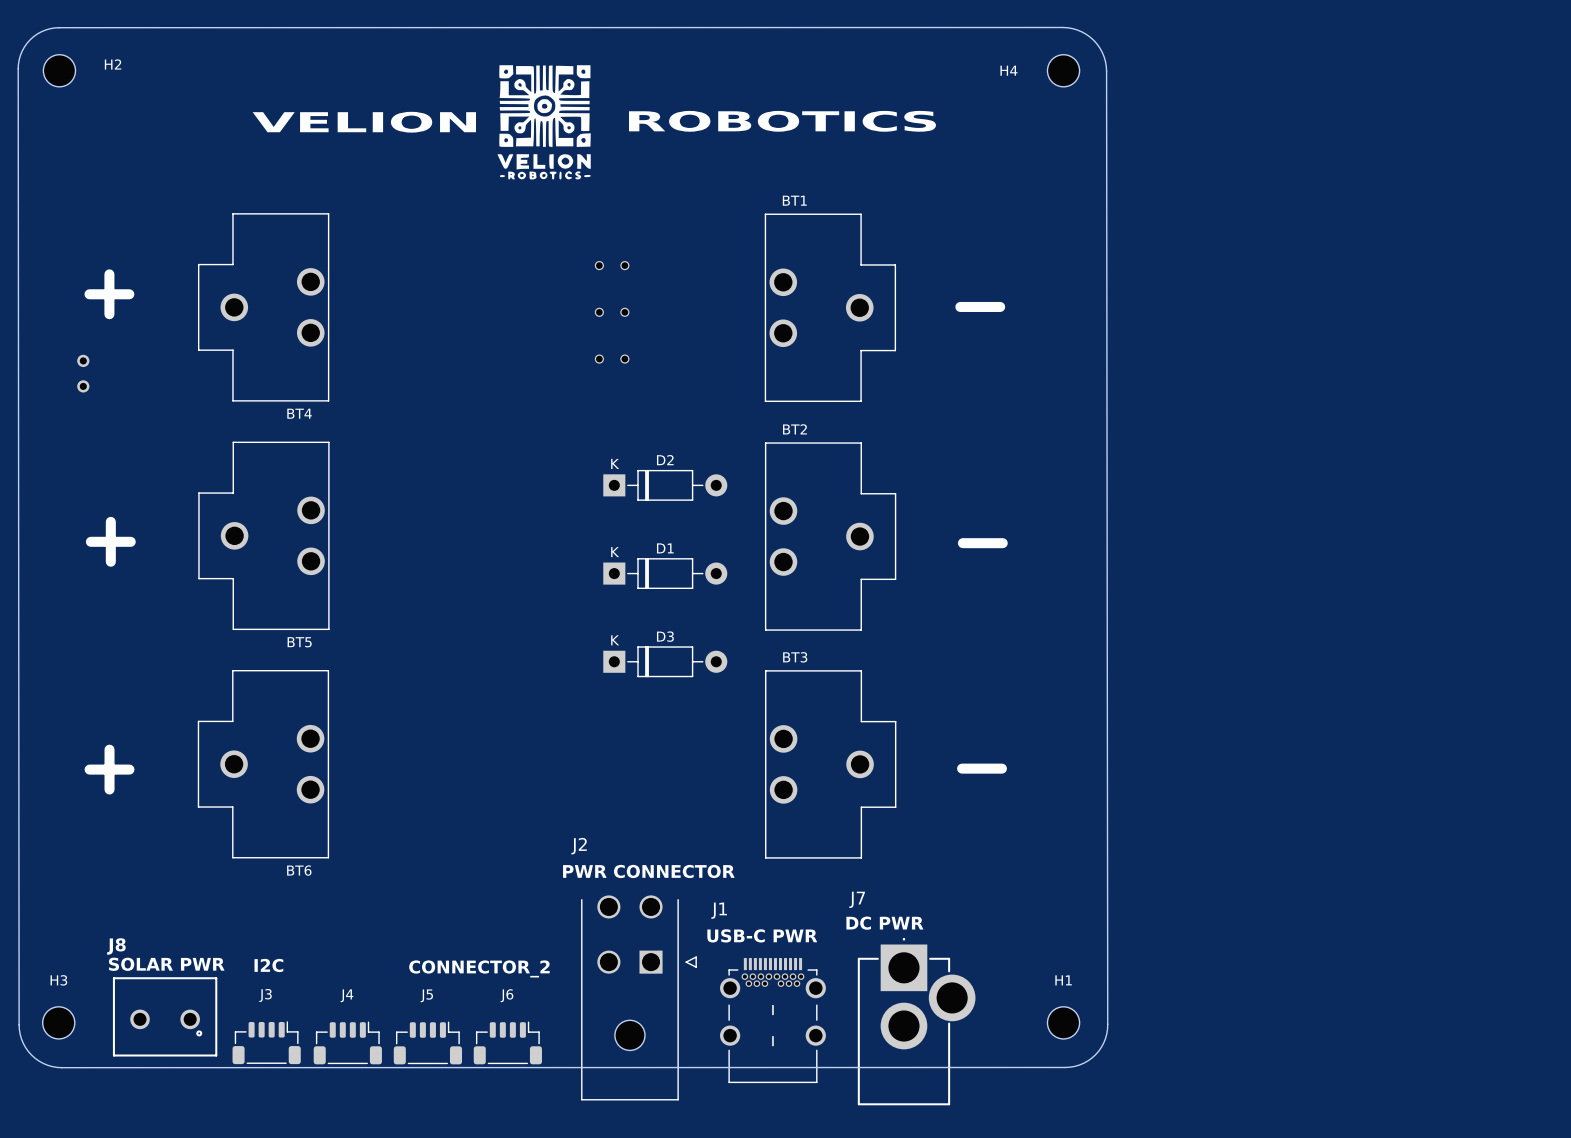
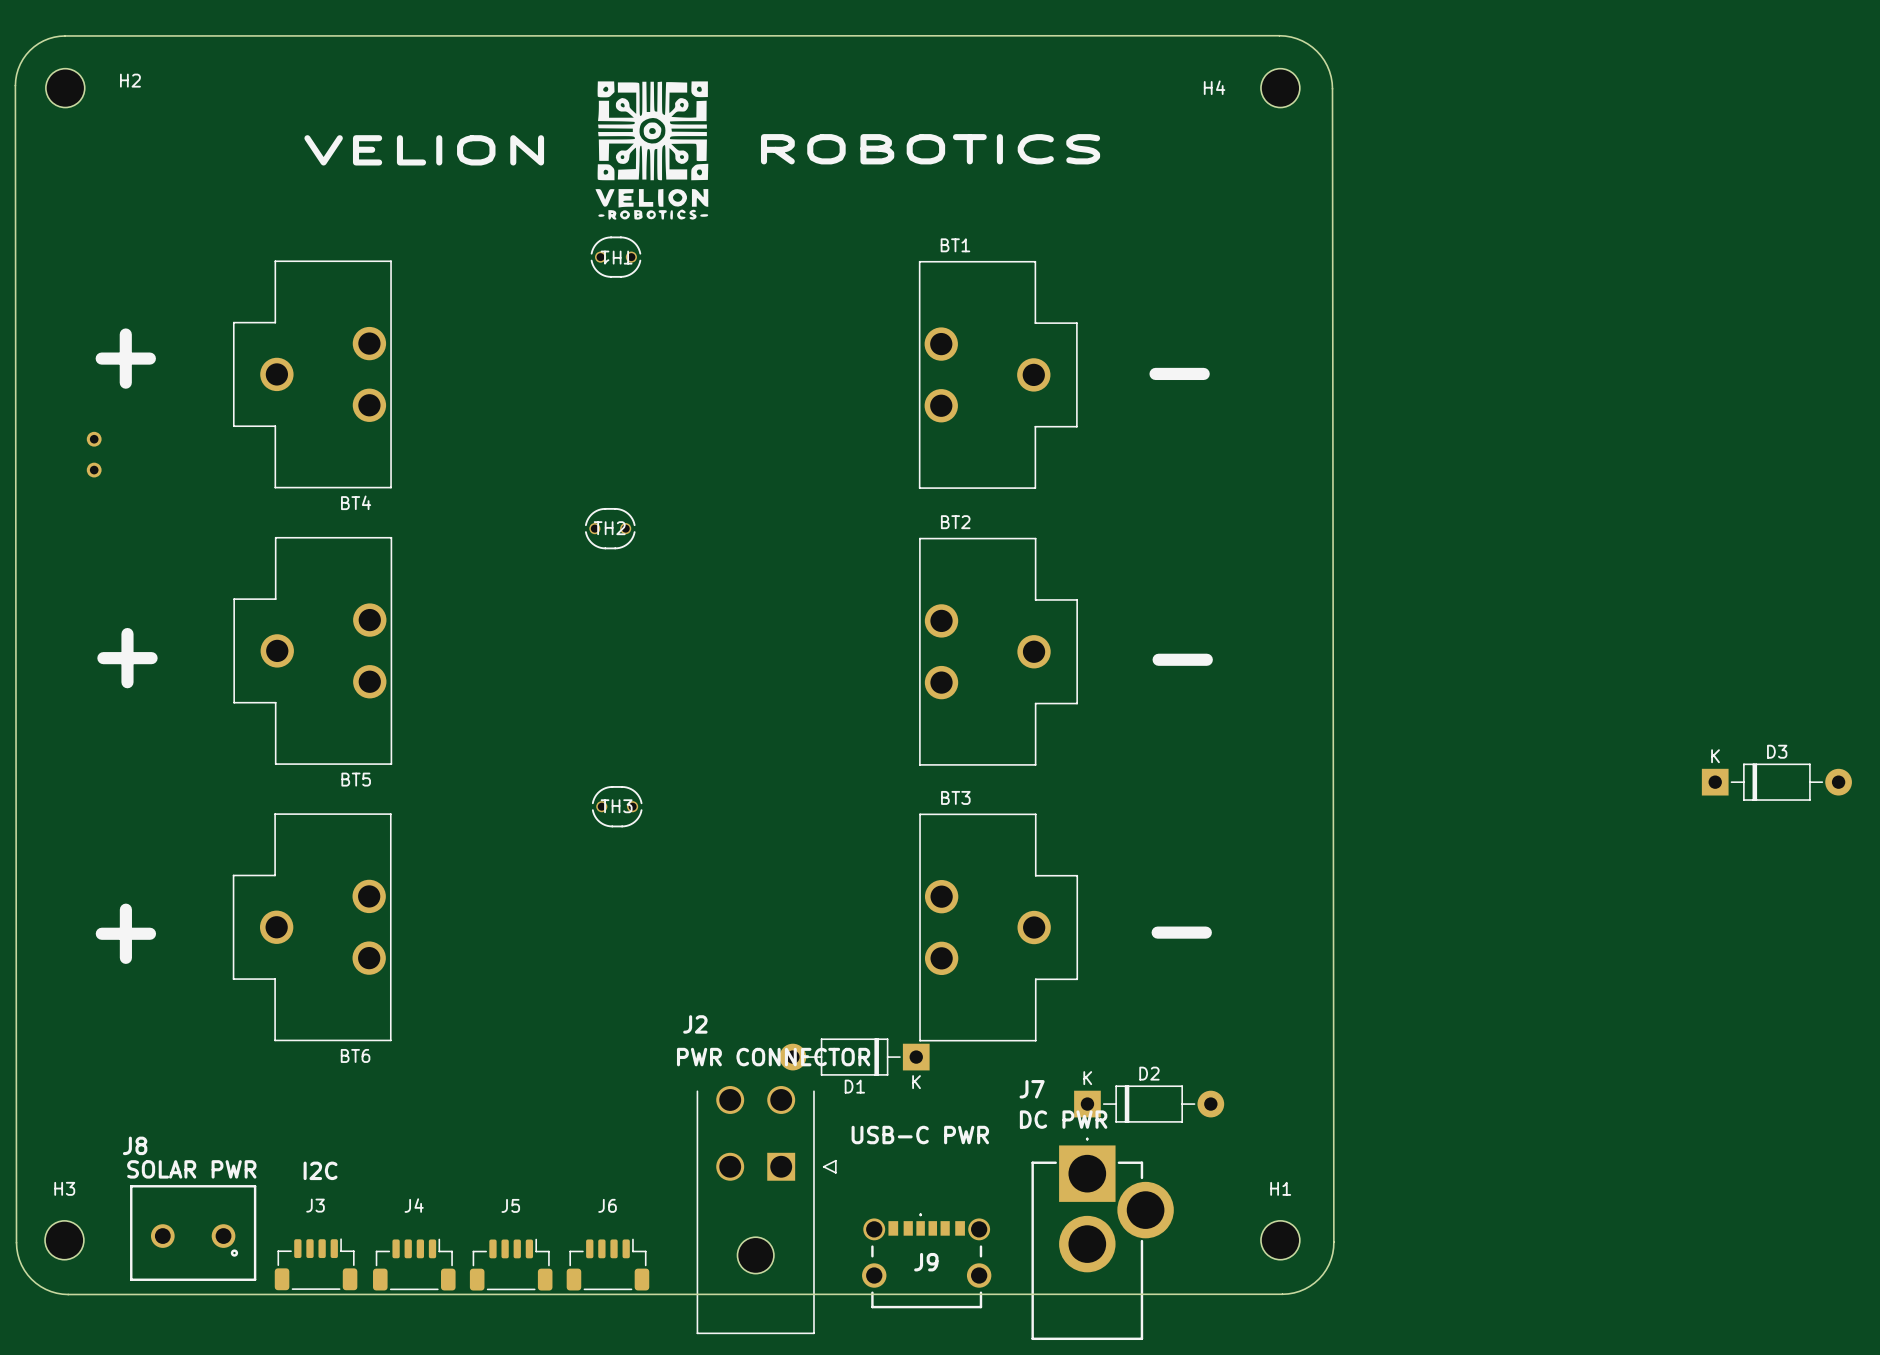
TH1 side: bottom (612, 265) -> top (615, 257)
TH2 side: bottom (612, 312) -> top (610, 528)
part: (612, 359) -> none
D2 position: (665, 485) -> (1149, 1104)
D1 rotation: 0° (665, 573) -> 180° (854, 1057)
D1 position: (665, 573) -> (854, 1057)
D3 position: (665, 661) -> (1776, 782)
TH3: none -> (617, 806)
text: CONNECTOR_2 (479, 968) -> none
J1: (772, 1020) -> none
J9: none -> (926, 1260)

